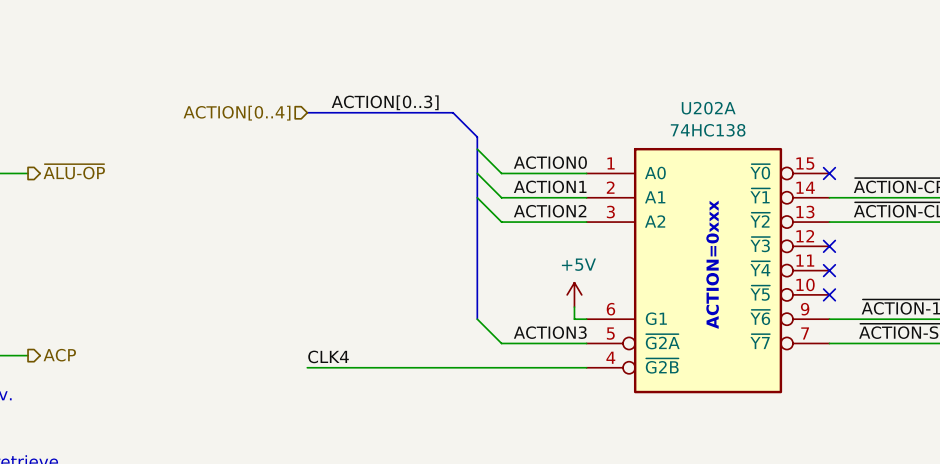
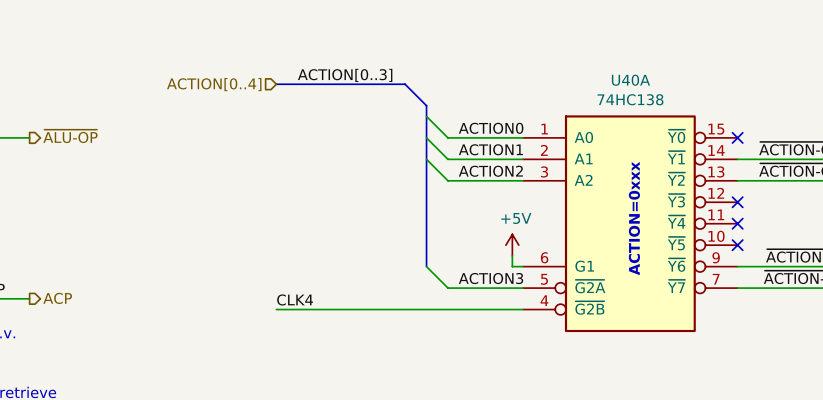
U202A name: U202A (708, 108) -> U40A (630, 80)

